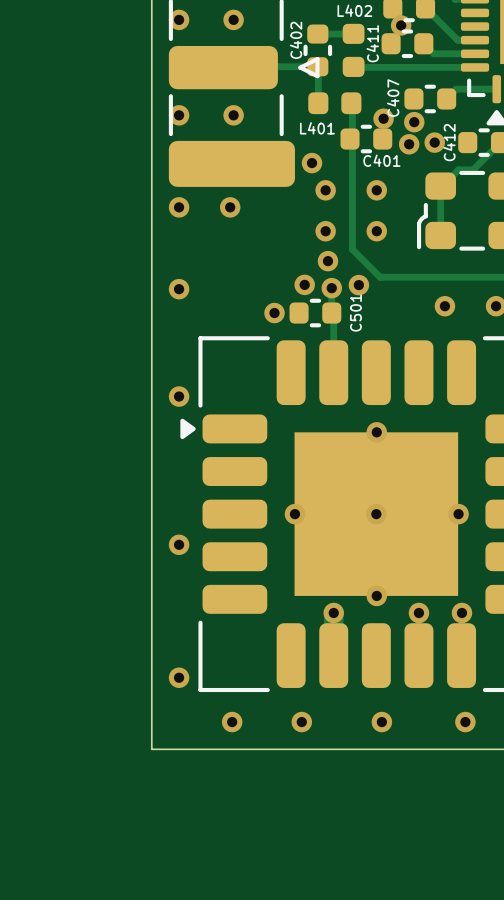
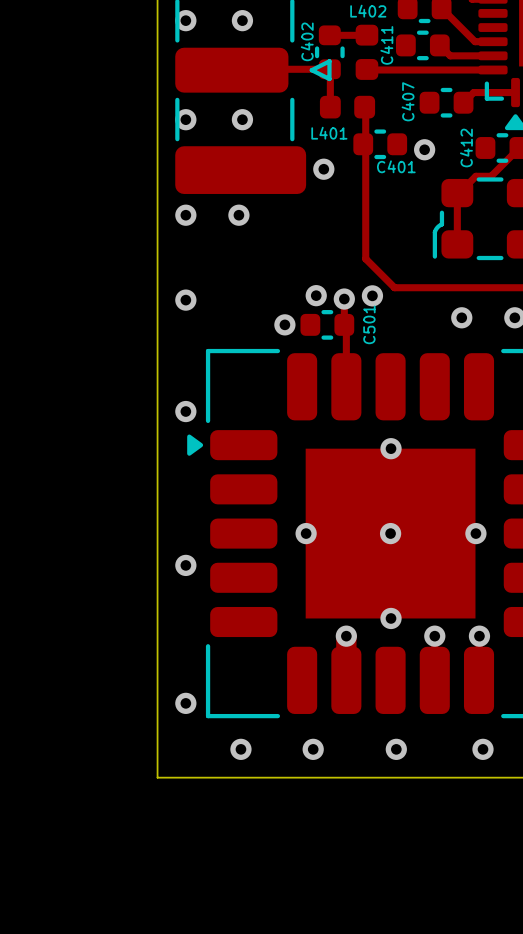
via: (401, 25) -> none
via: (383, 118) -> none
via: (414, 122) -> none
via: (434, 142) -> none
via: (325, 190) -> none
via: (376, 190) -> none
via: (325, 231) -> none
via: (376, 231) -> none
via: (327, 261) -> none

